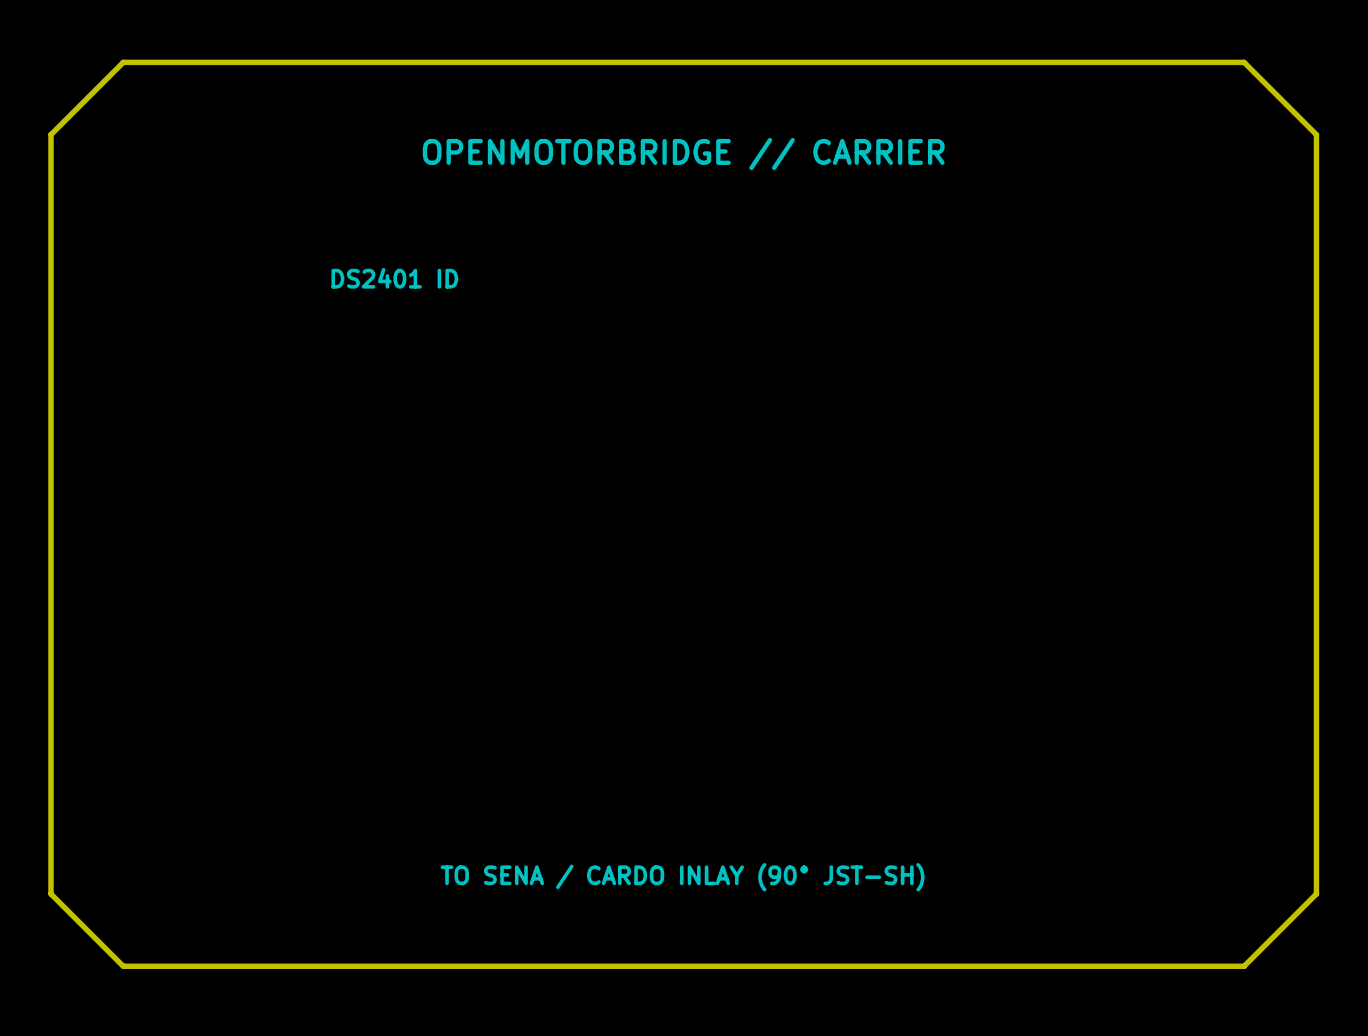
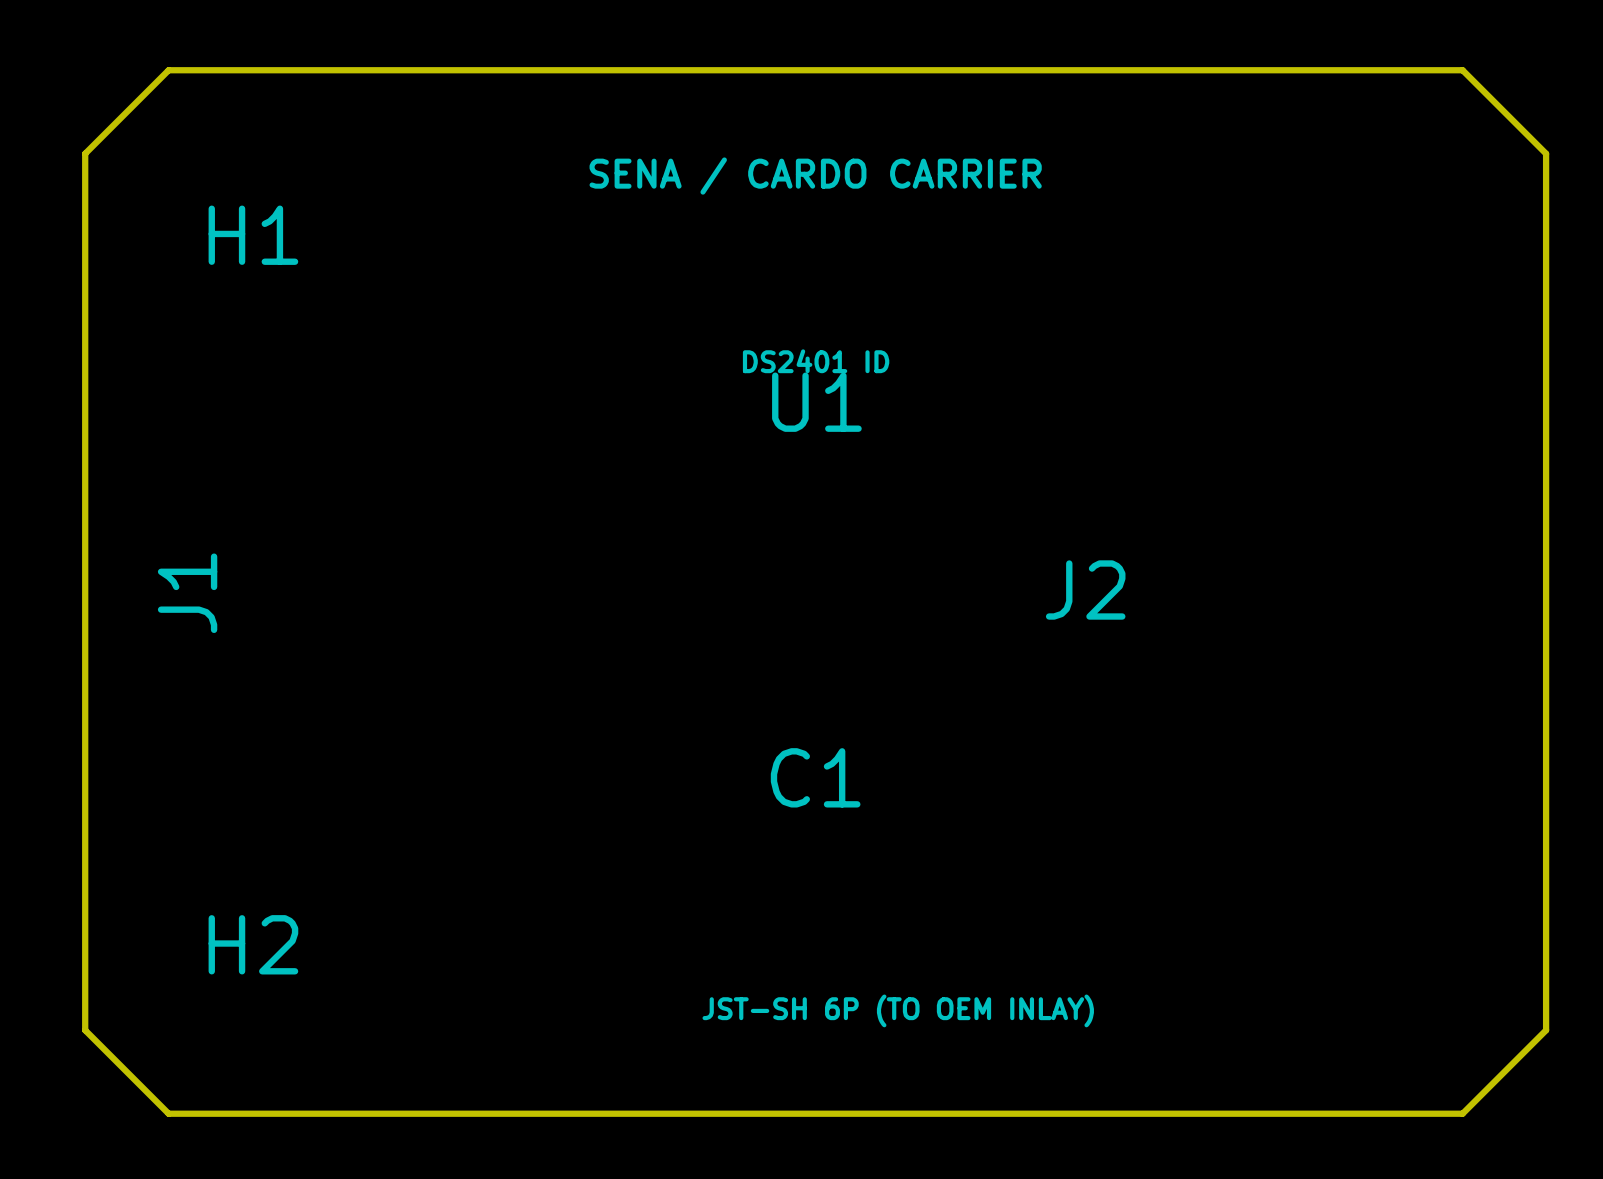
text: OPENMOTORBRIDGE // CARRIER (683, 154) -> SENA / CARDO CARRIER (815, 176)
H1: none -> (253, 235)
text position: DS2401 ID (394, 278) -> DS2401 ID (816, 361)
U1: none -> (816, 402)
J2: none -> (1085, 590)
J1: none -> (187, 593)
C1: none -> (815, 777)
H2: none -> (253, 944)
text: TO SENA / CARDO INLAY (90° JST-SH) (682, 877) -> none
text: none -> JST-SH 6P (TO OEM INLAY) (898, 1010)

